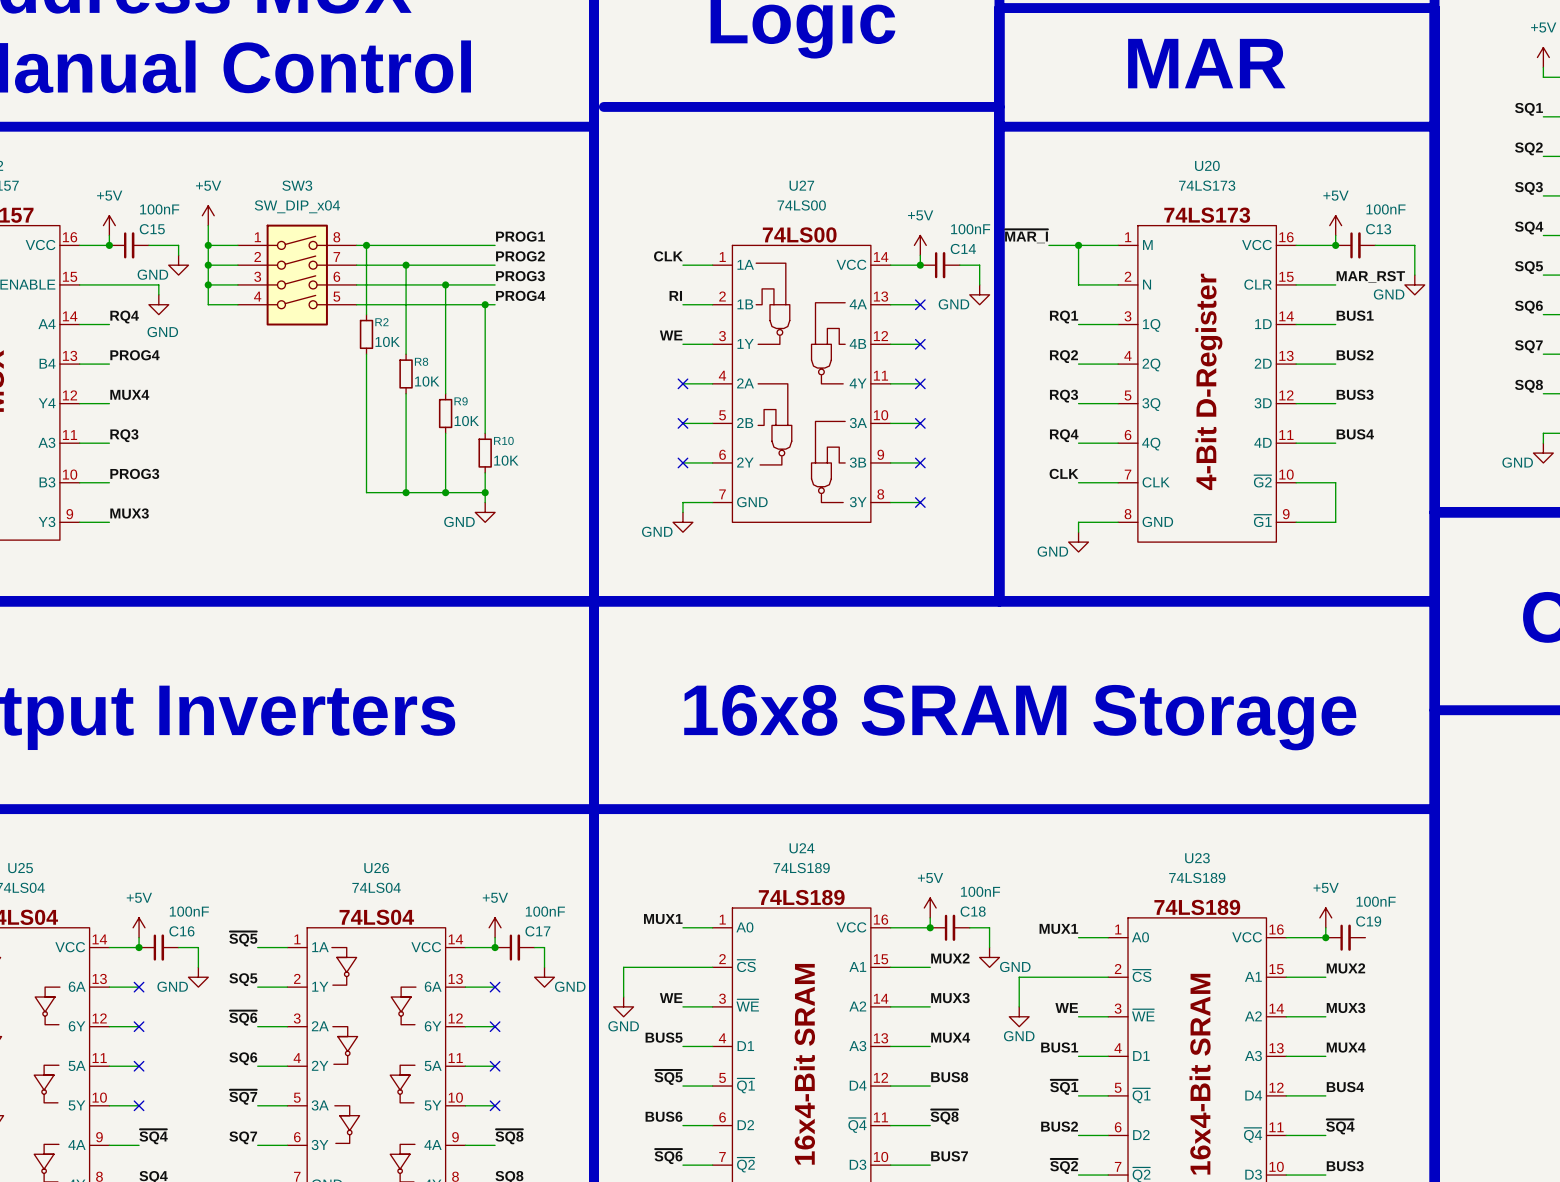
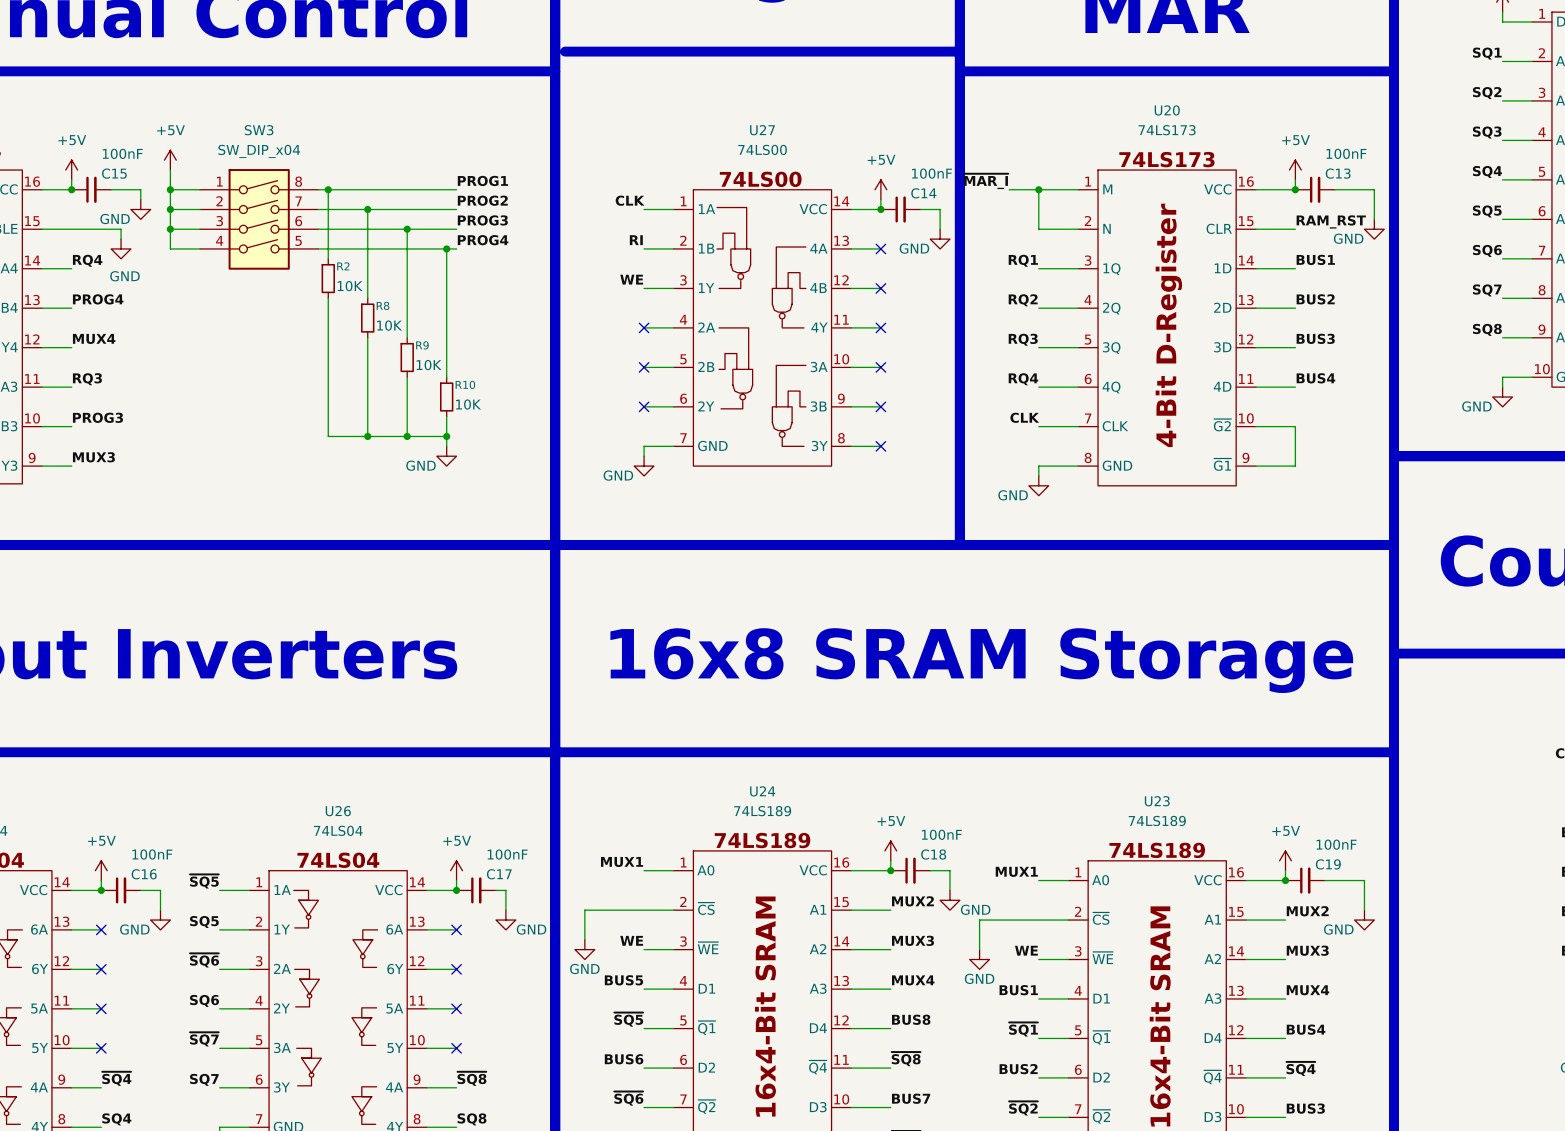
label: MAR_RST (1370, 276) -> RAM_RST (1331, 221)
wire: none -> (1324, 880) (1364, 880) (1364, 910)
power symbol: none -> GND (1364, 920)

